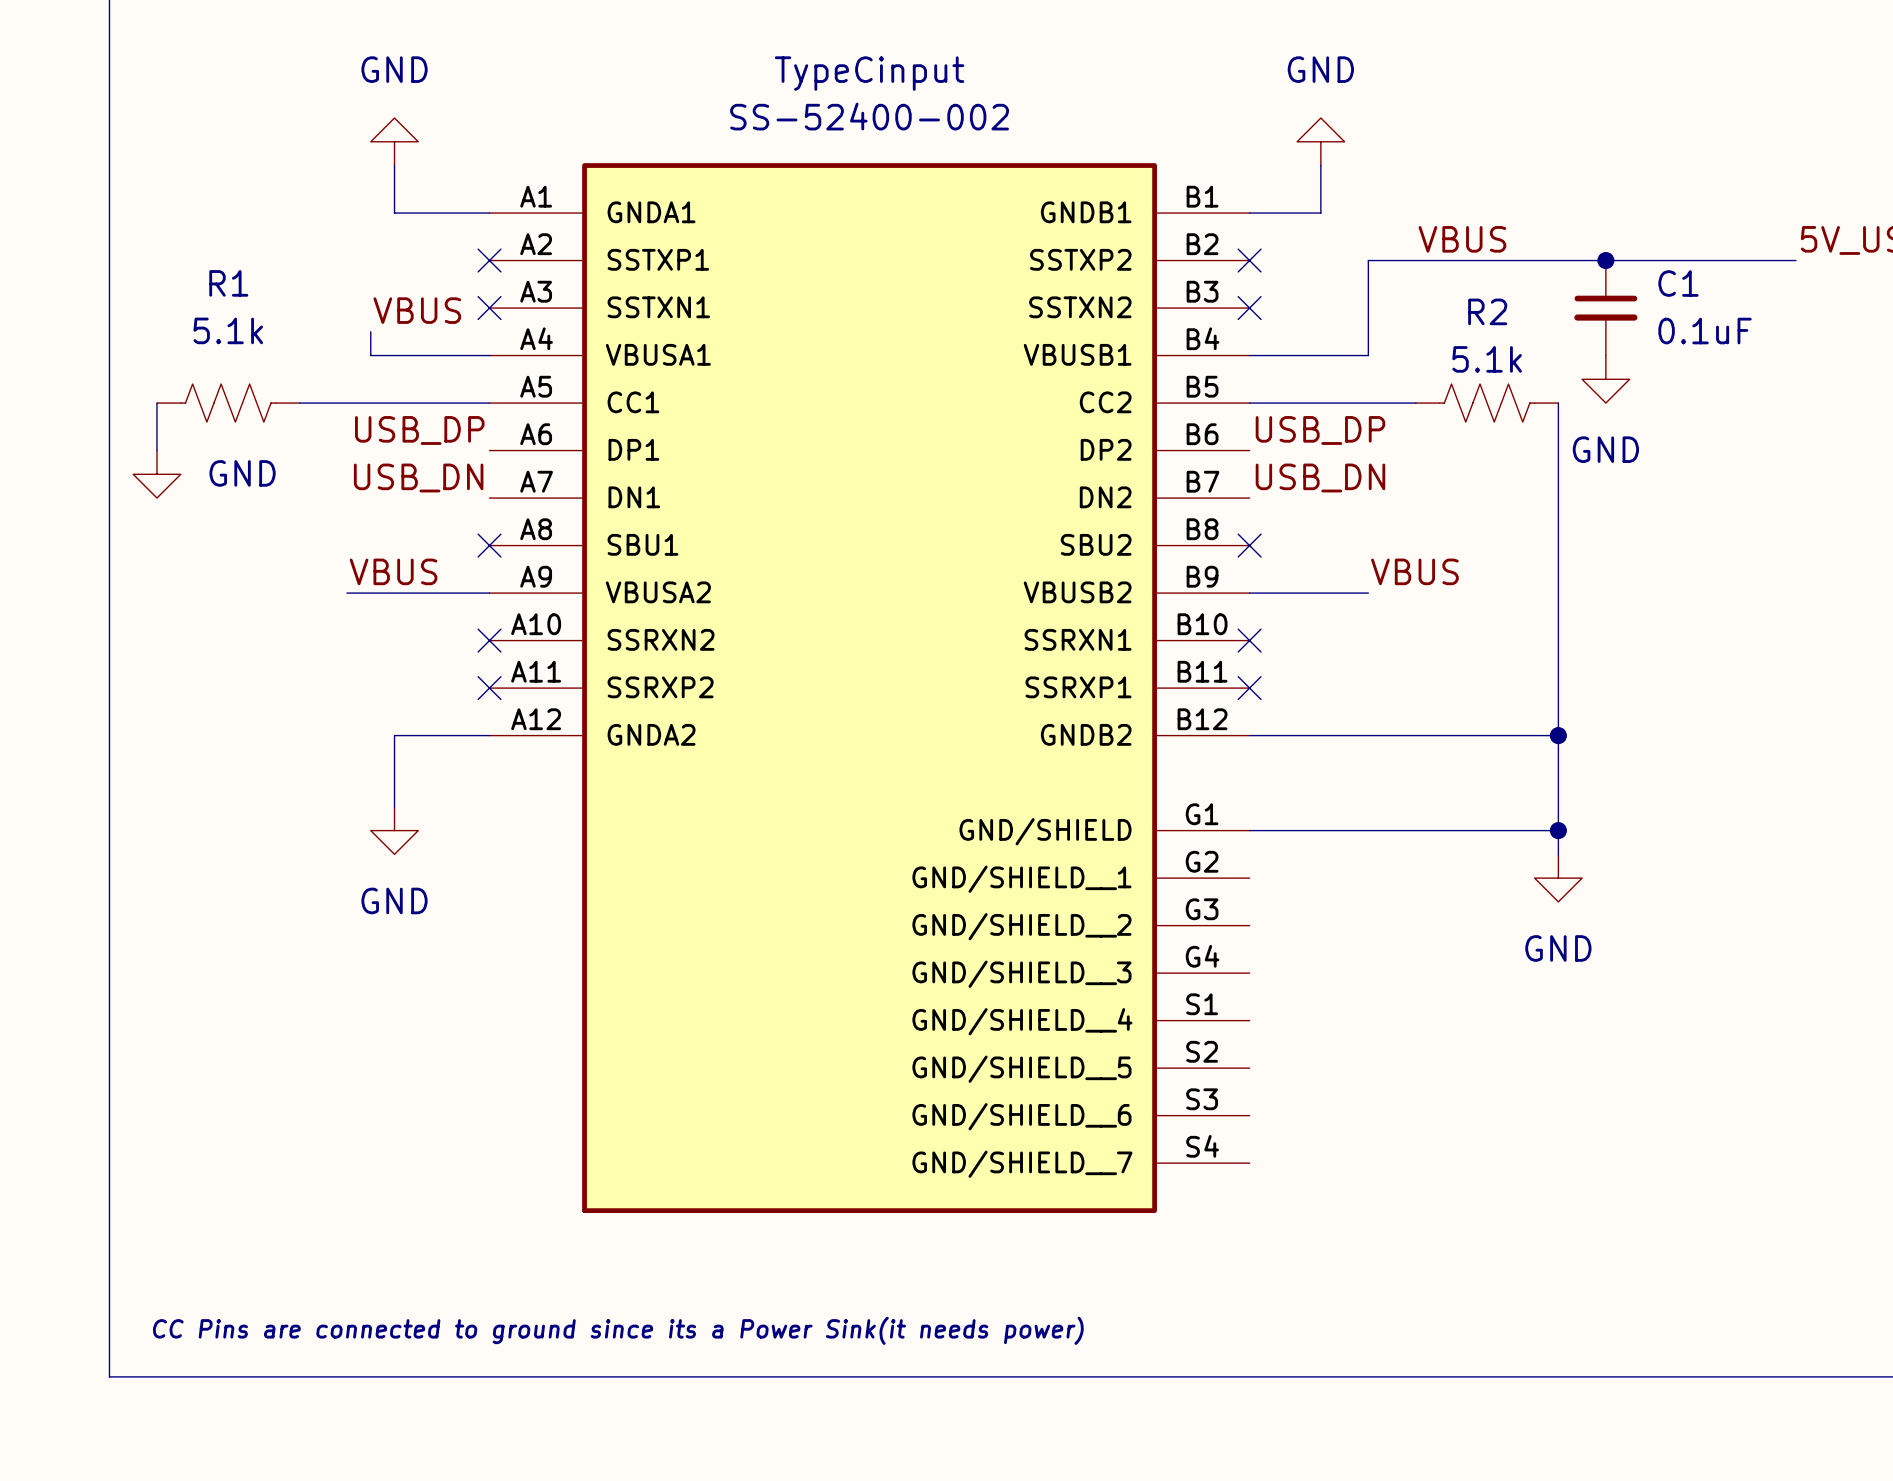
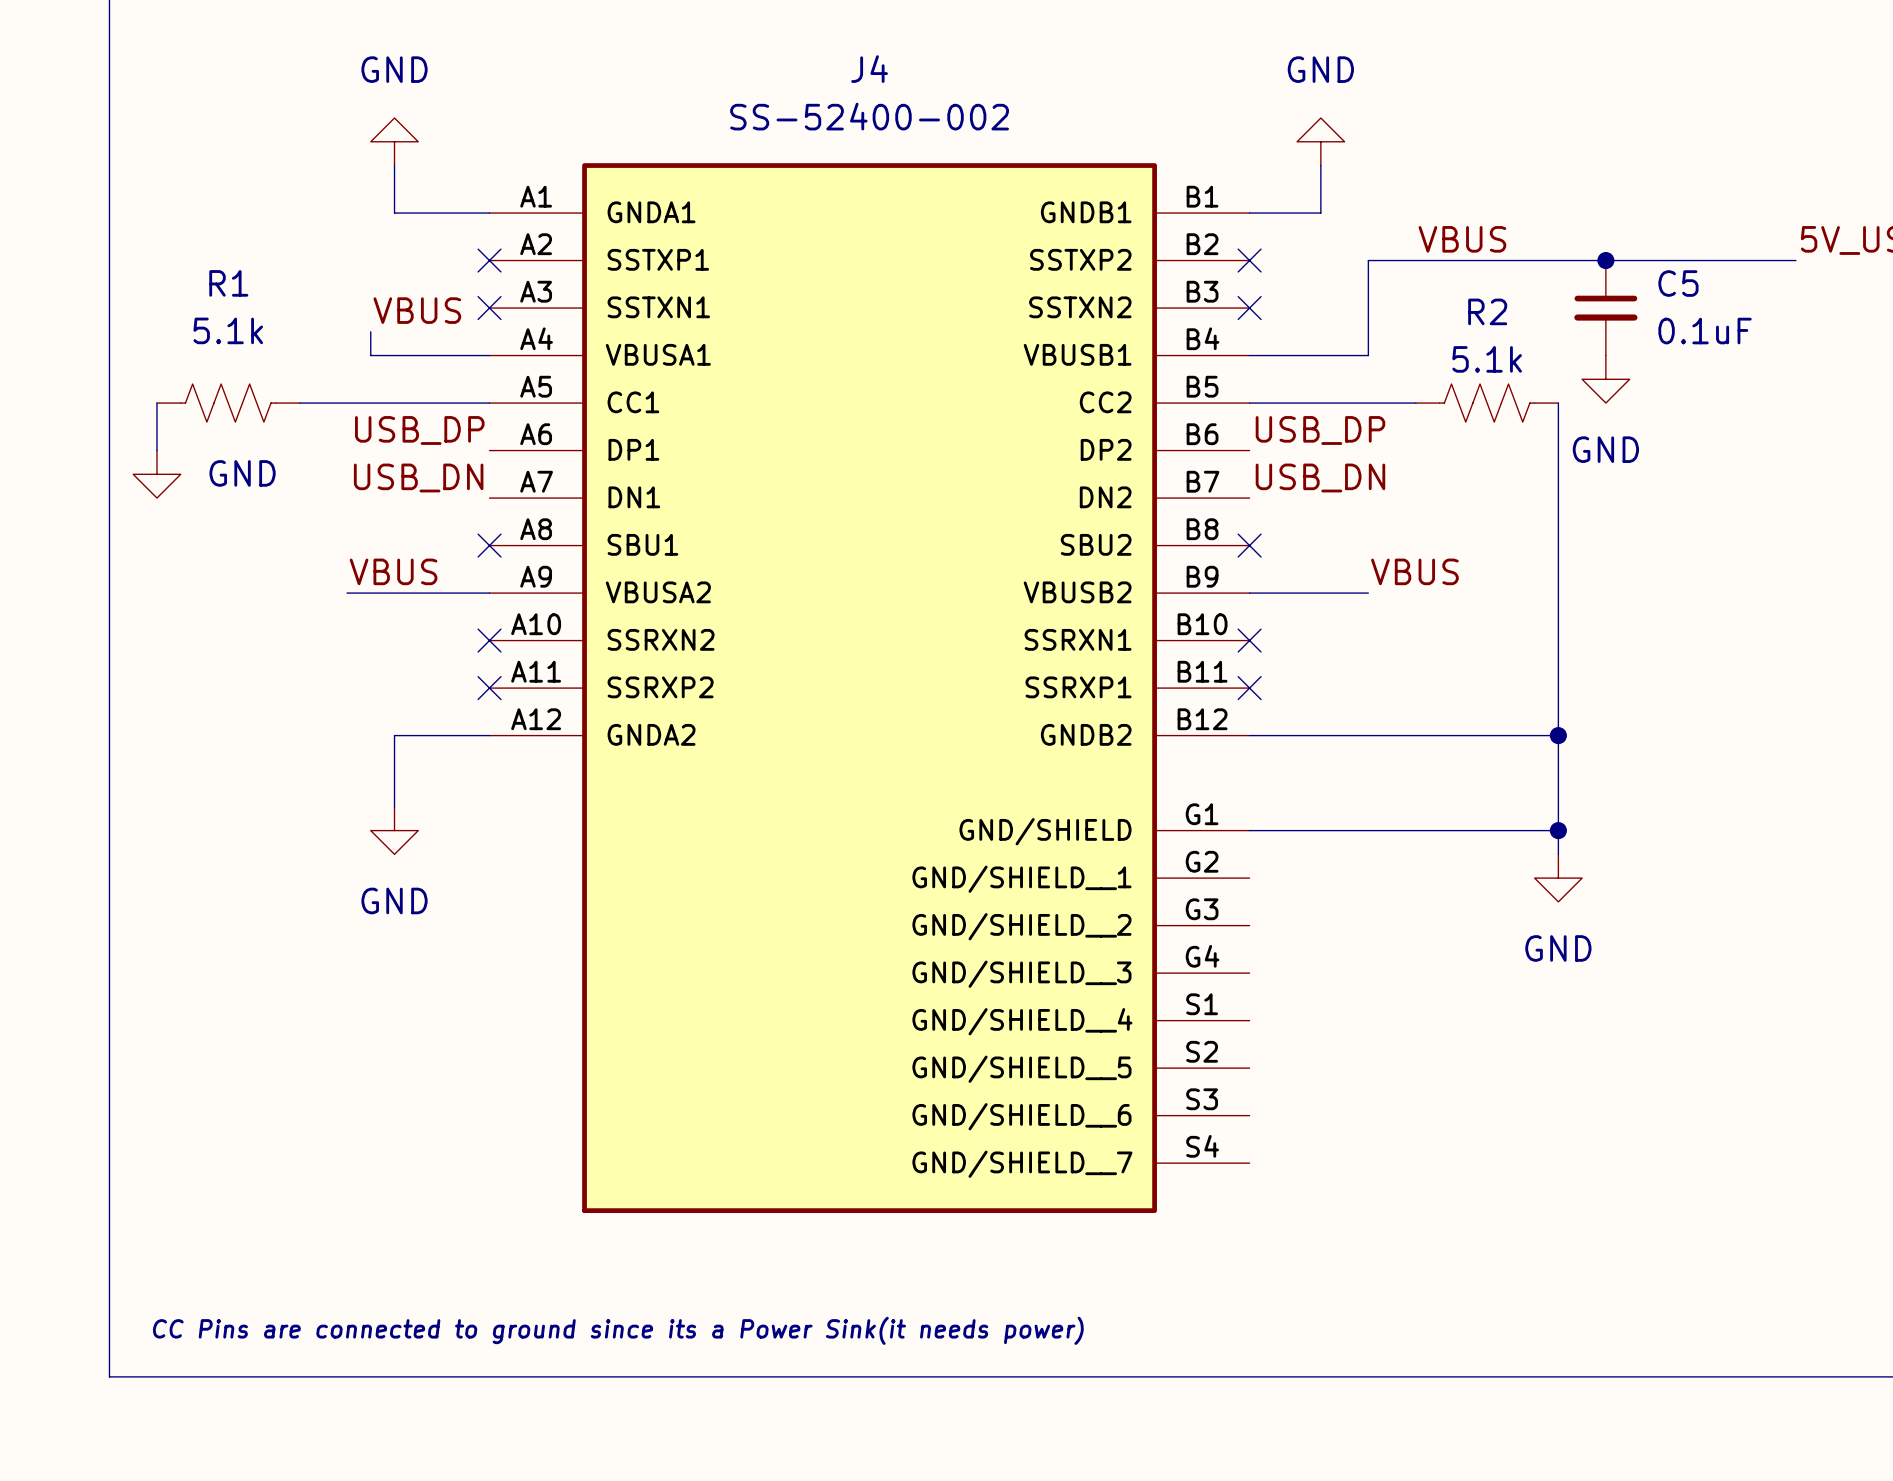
TypeCinput name: TypeCinput (869, 73) -> J4 (869, 69)
C1 name: C1 (1678, 283) -> C5 (1678, 283)

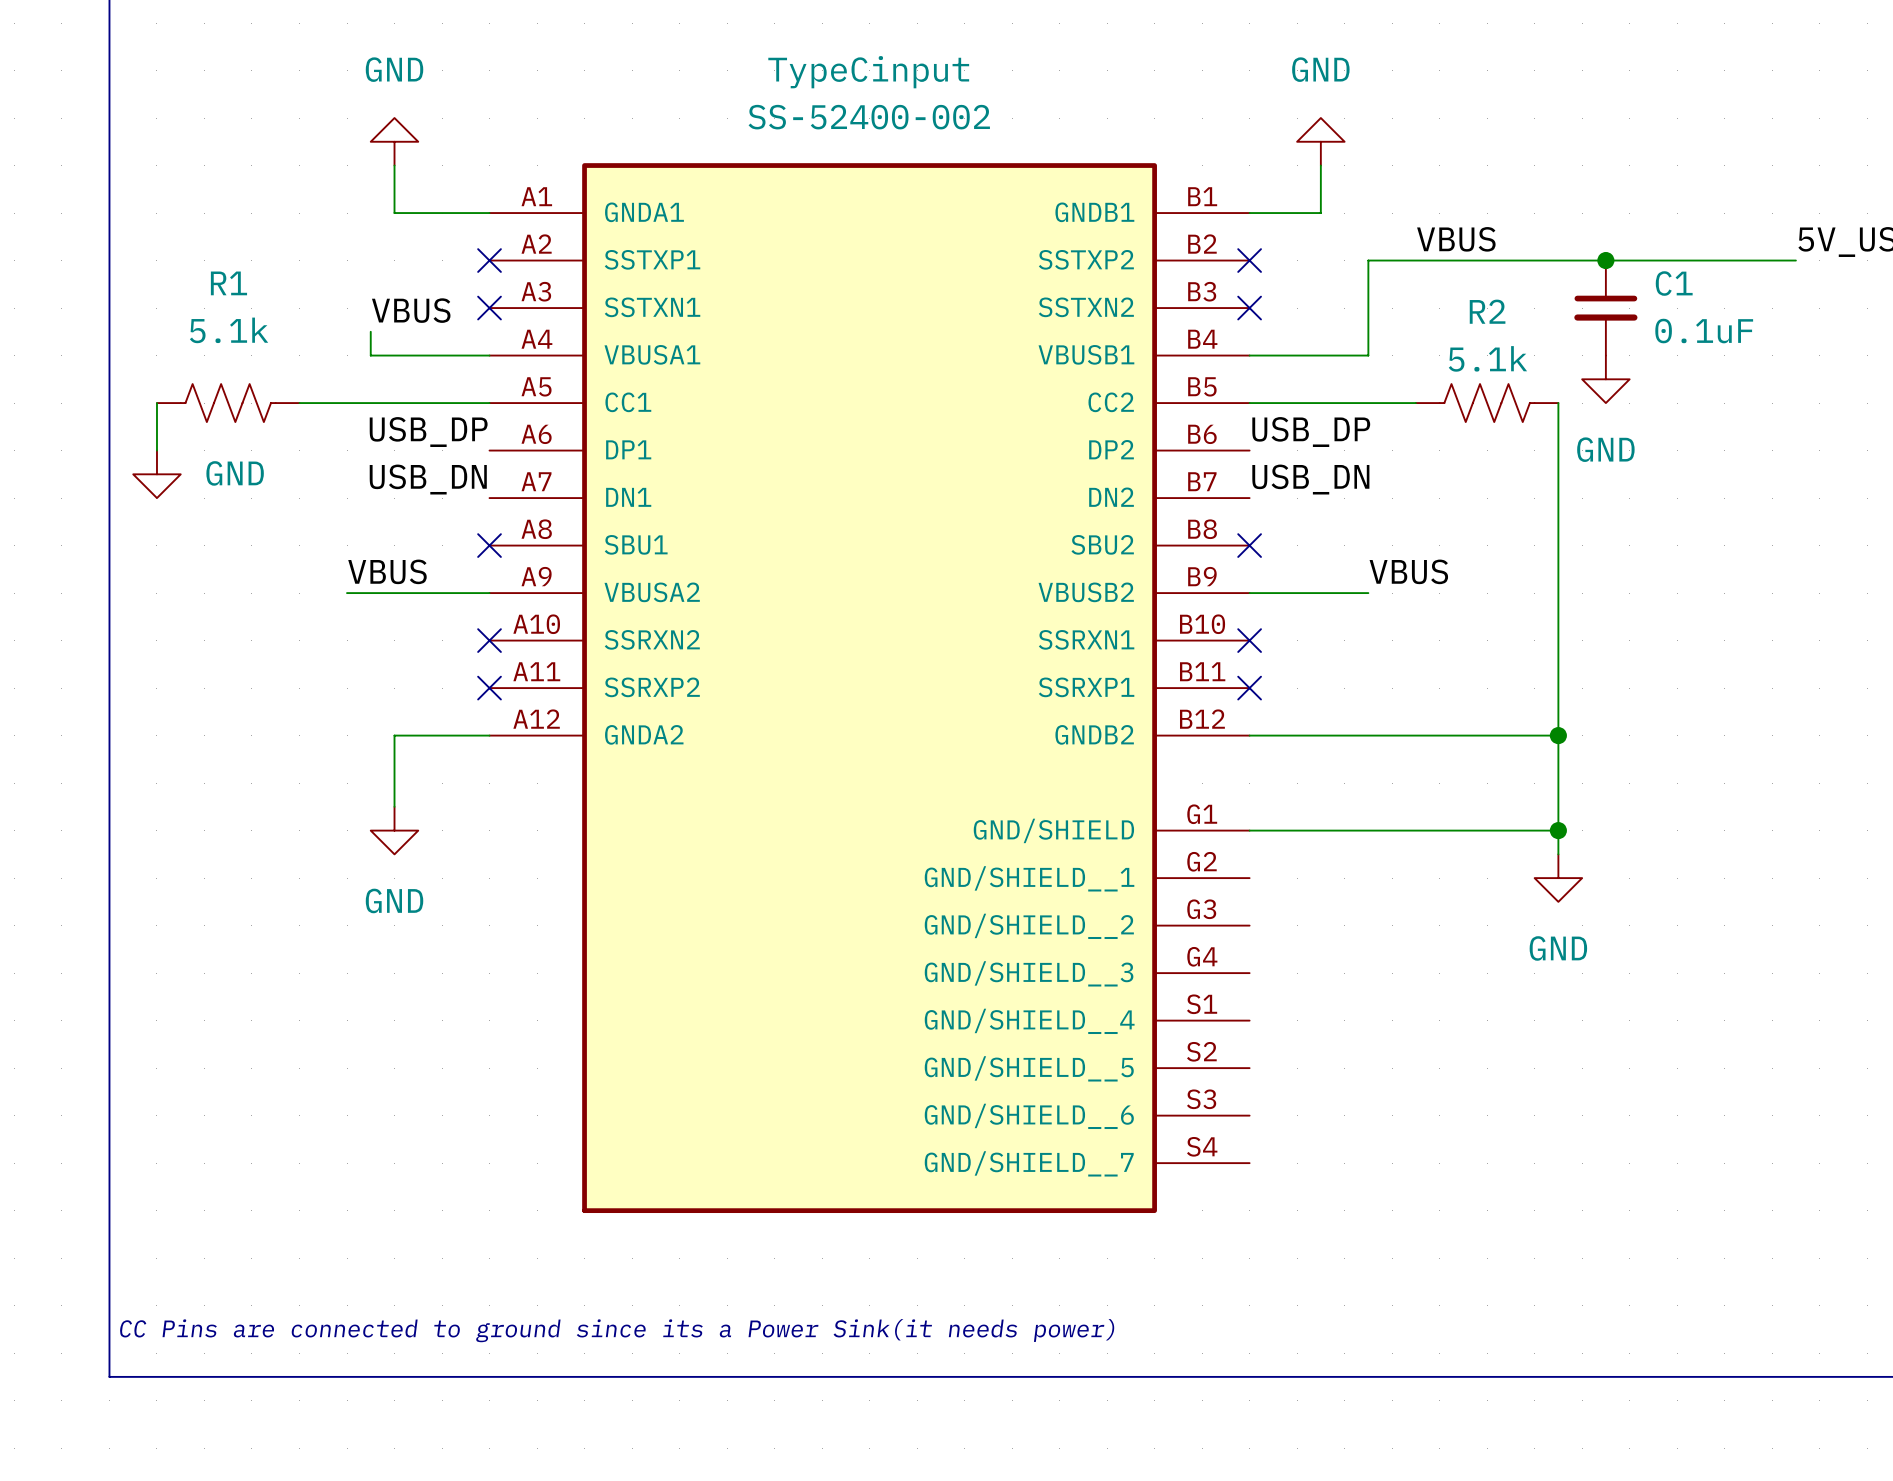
J4 name: J4 (869, 69) -> TypeCinput (868, 72)
C5 name: C5 (1678, 283) -> C1 (1674, 283)

